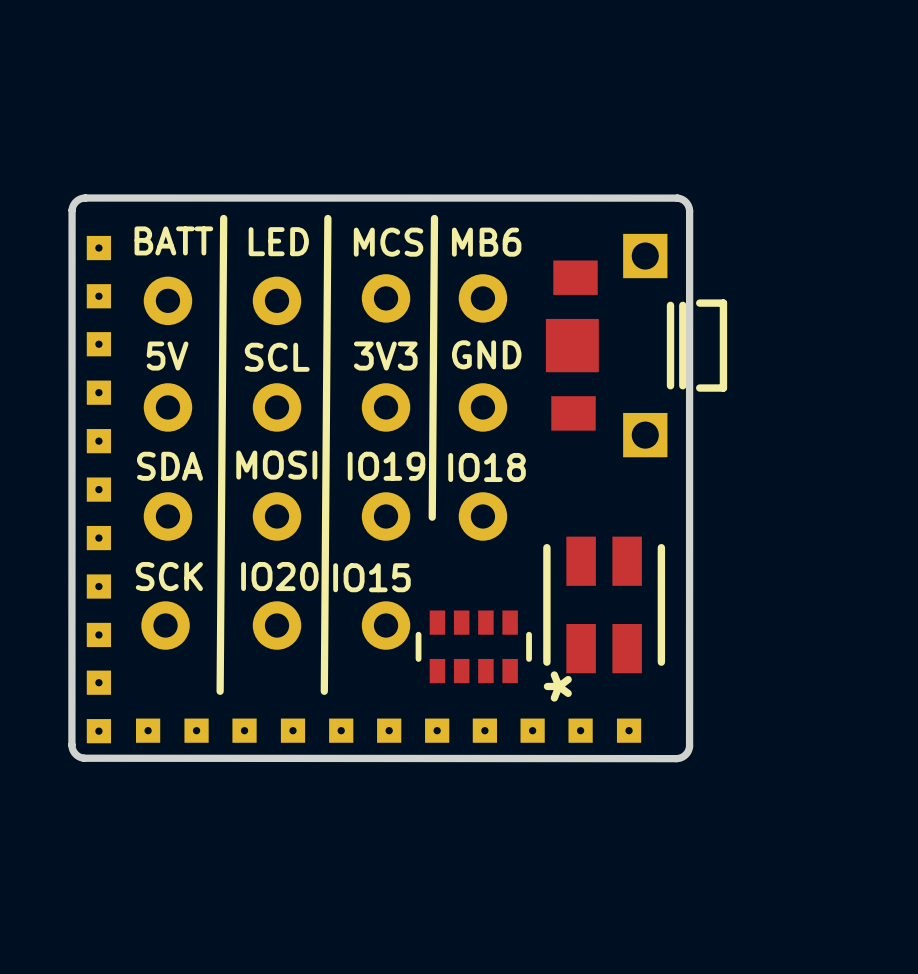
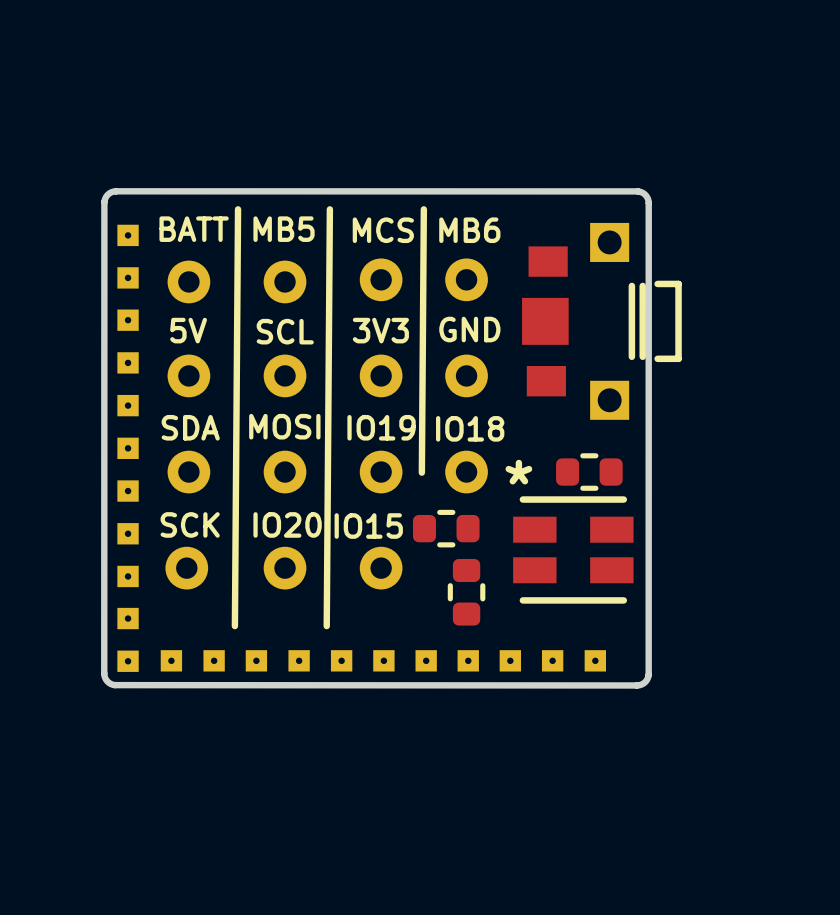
text: LED (278, 241) -> MB5 (284, 229)
part: none -> (589, 472)
part footprint: [543, 536, 666, 674] -> [513, 496, 634, 604]
part: none -> (446, 528)
part footprint: [415, 610, 532, 684] -> [447, 558, 486, 626]

